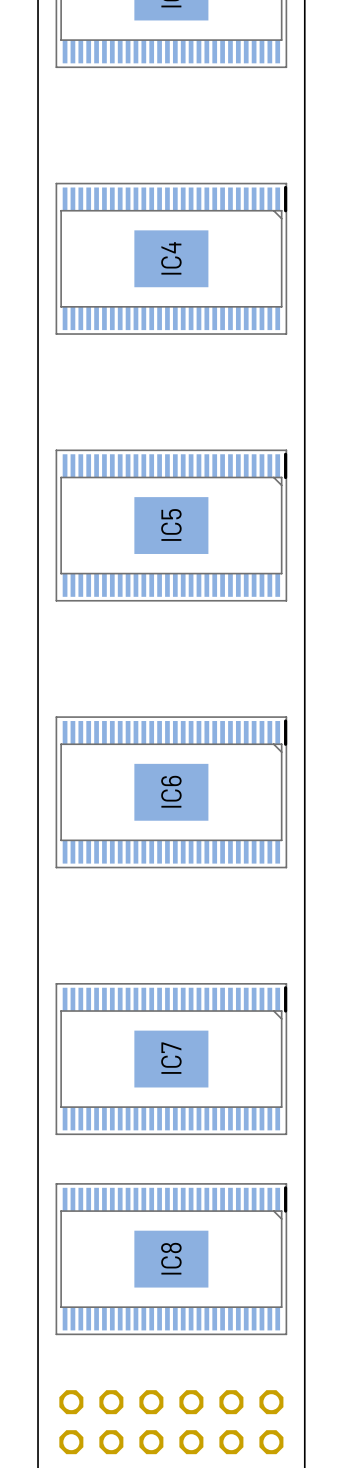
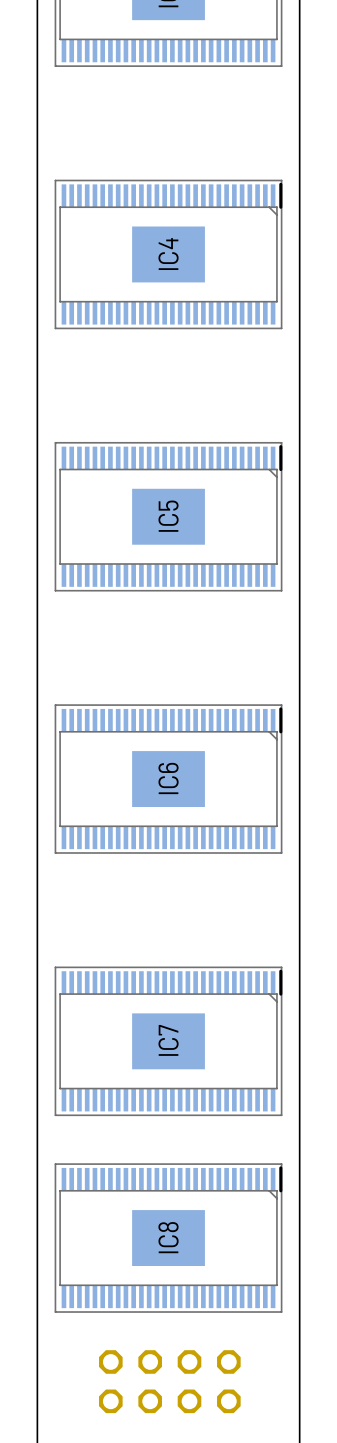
part: none -> (169, 1381)
part: (171, 1422) -> none

